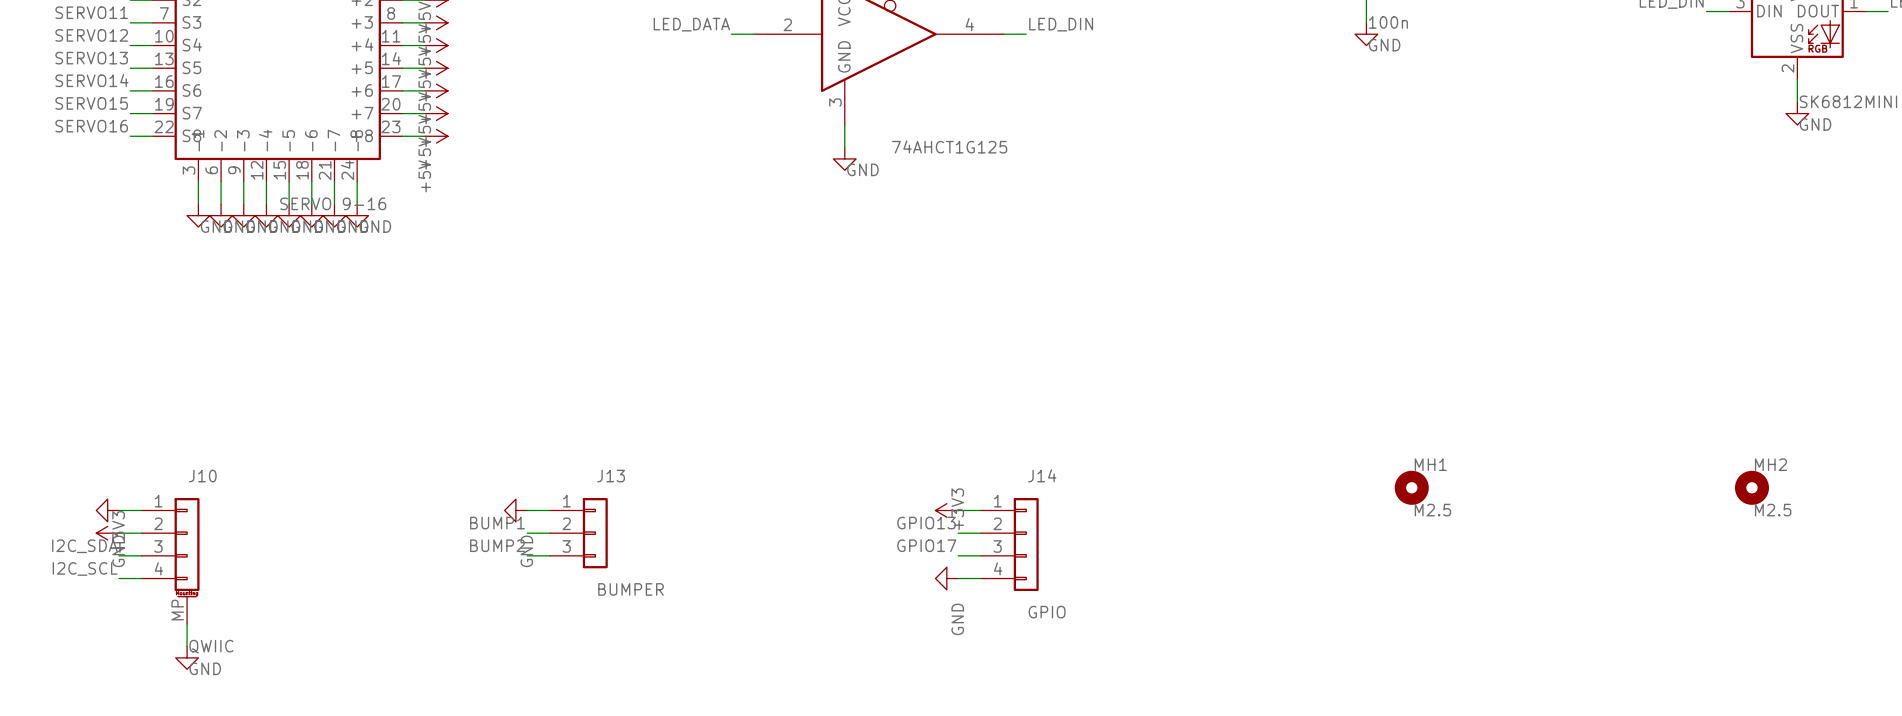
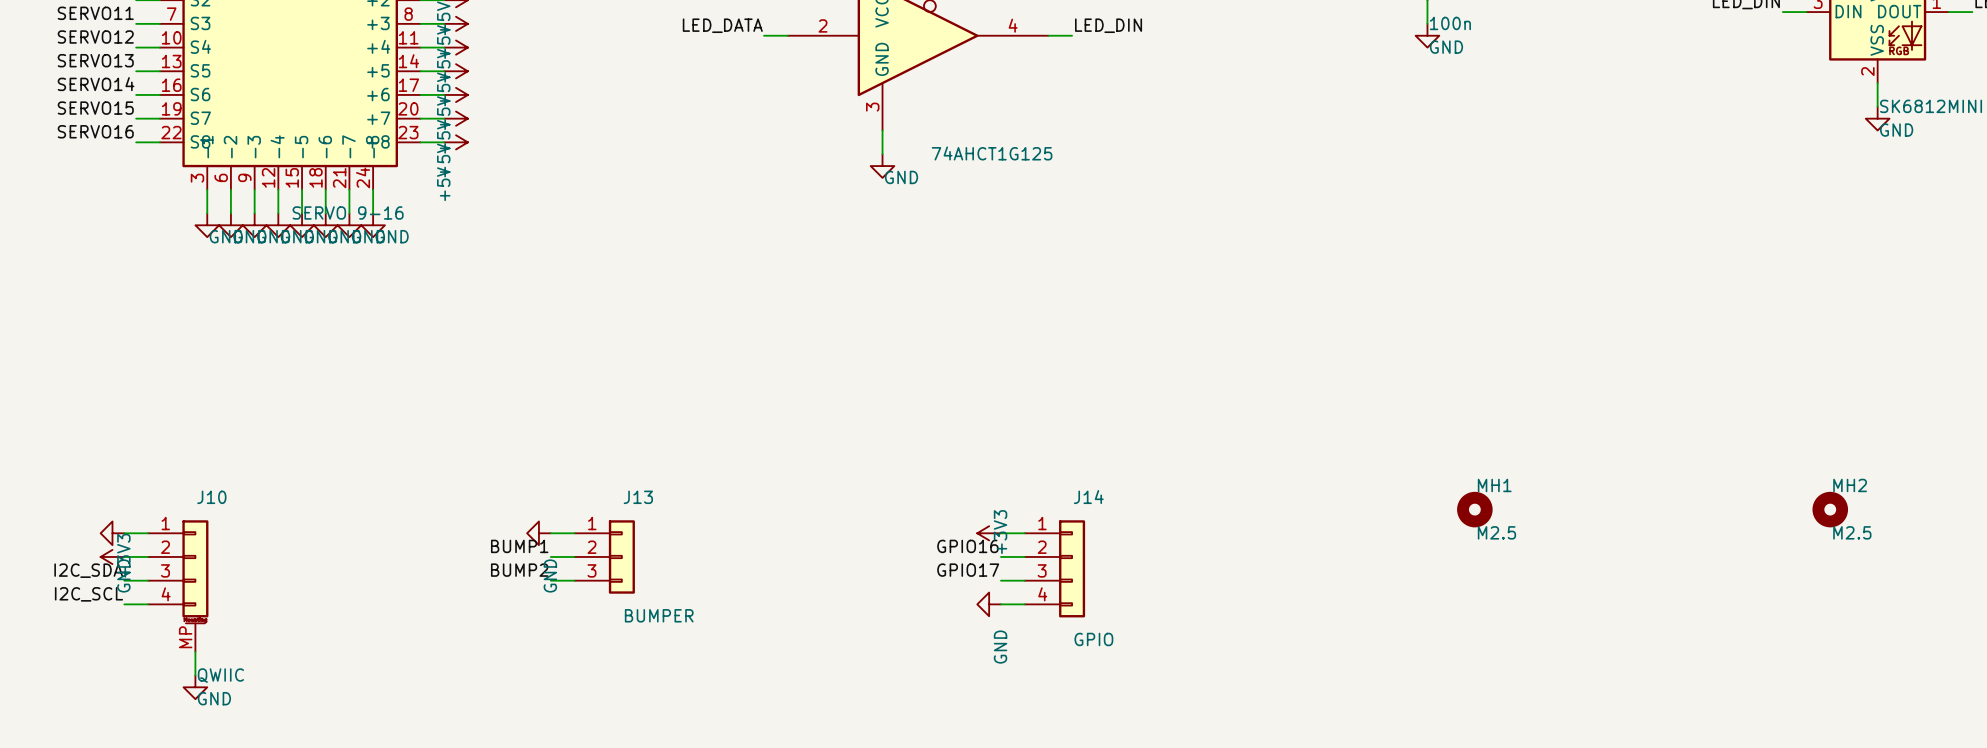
label: GPIO13 (926, 523) -> GPIO16 (967, 546)

